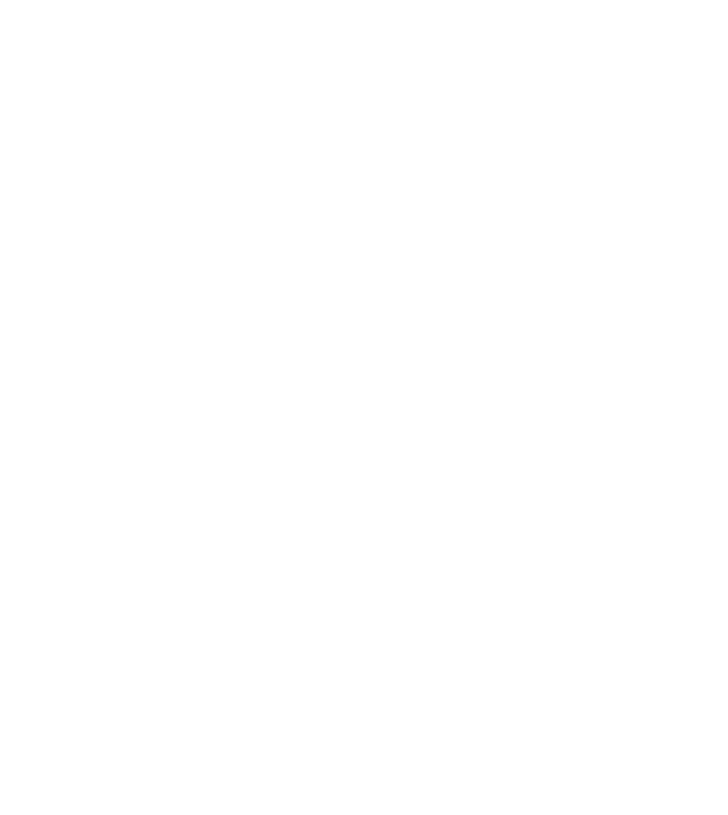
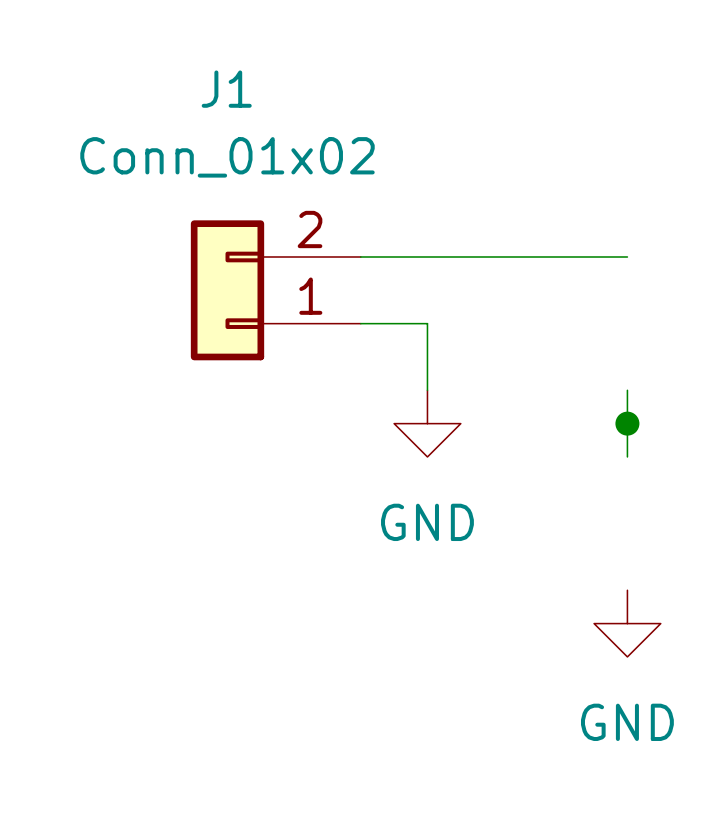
wire: none -> (360, 256) (627, 256)
J1: none -> Conn_01x02 (275, 290)
wire: none -> (360, 323) (427, 323) (427, 390)
wire: none -> (627, 390) (627, 456)
power symbol: none -> GND (427, 423)
junction: none -> (627, 423)
power symbol: none -> GND (627, 623)

